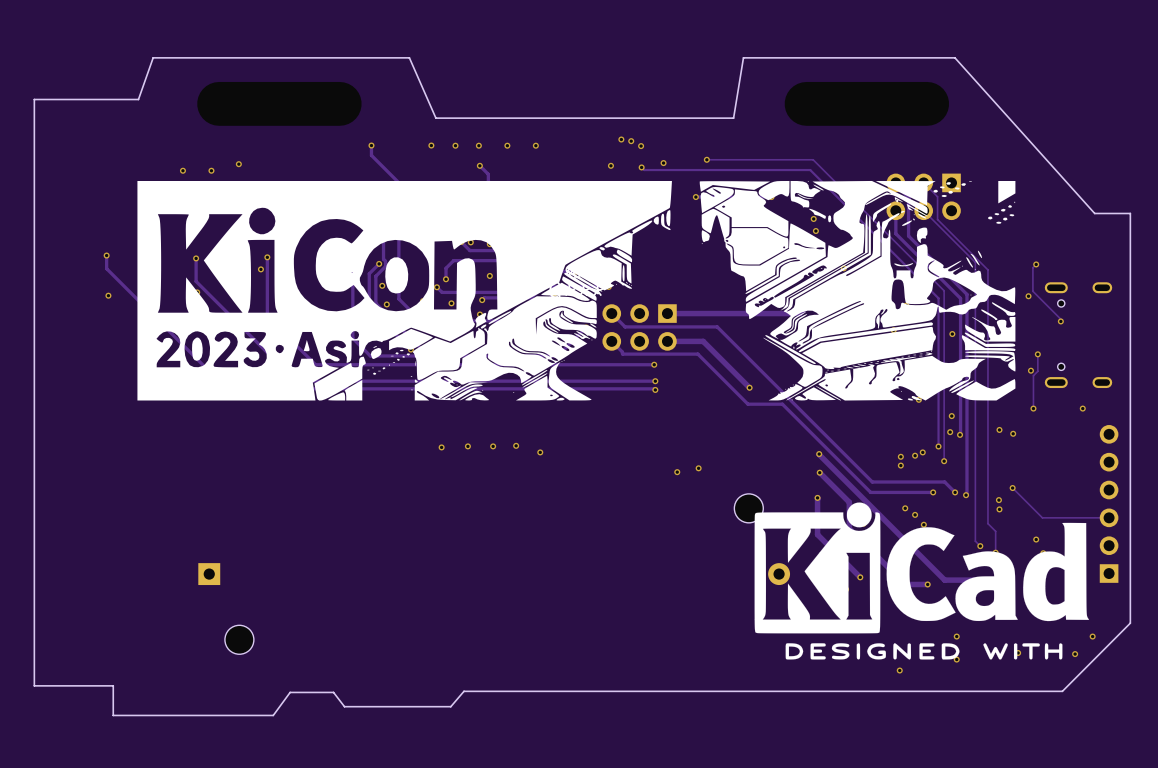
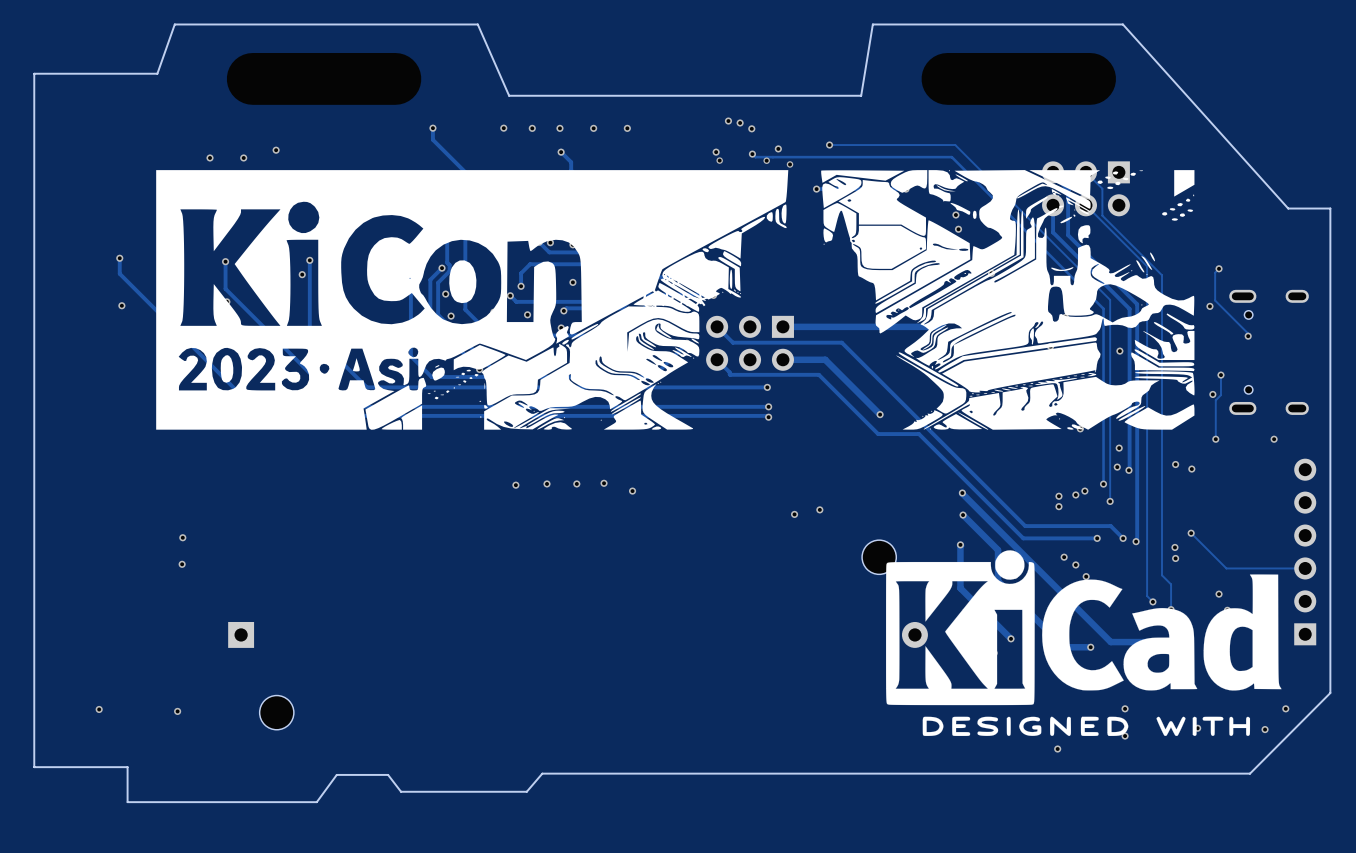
via: none -> (719, 160)
via: none -> (766, 160)
via: none -> (790, 164)
via: none -> (182, 537)
via: none -> (182, 564)
via: none -> (99, 709)
via: none -> (177, 711)

